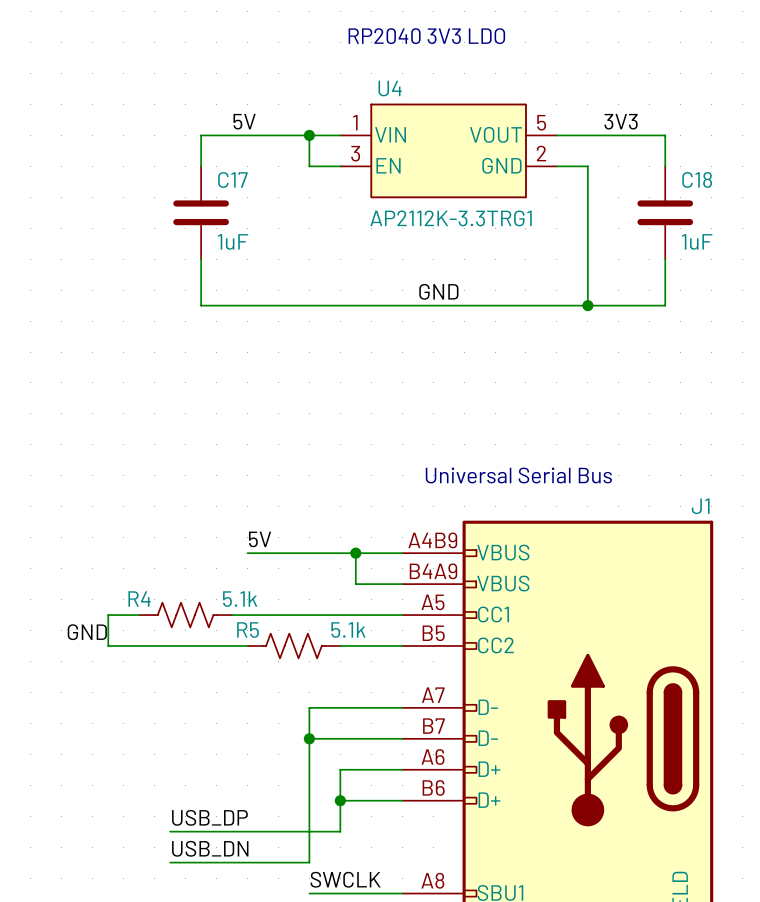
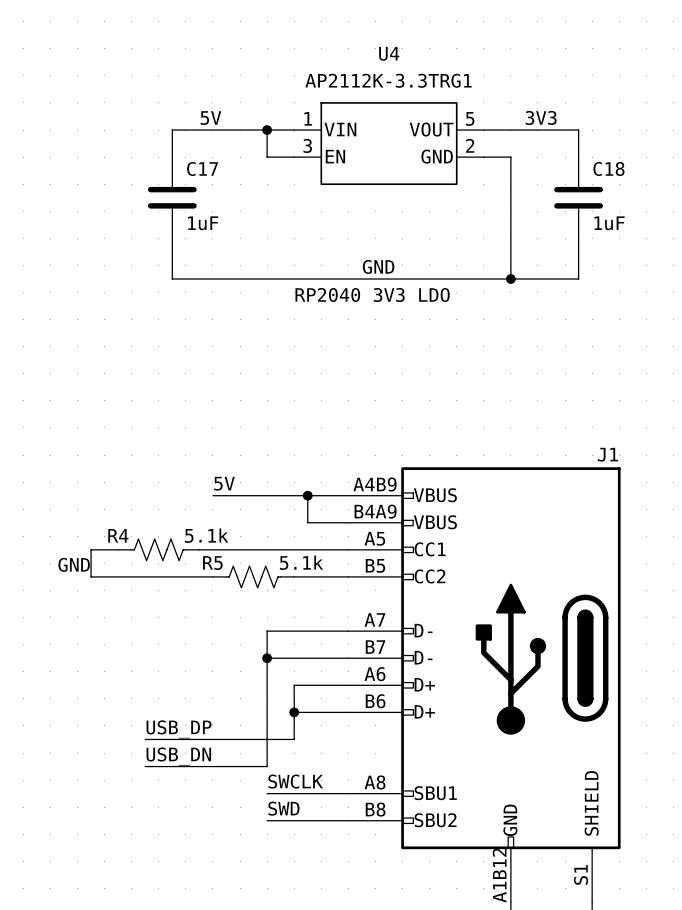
text position: RP2040 3V3 LDO (426, 36) -> RP2040 3V3 LDO (372, 295)
U4 name position: U4 (390, 88) -> U4 (389, 53)
U4 value position: AP2112K-3.3TRG1 (451, 218) -> AP2112K-3.3TRG1 (388, 80)
text: Universal Serial Bus (518, 475) -> none

